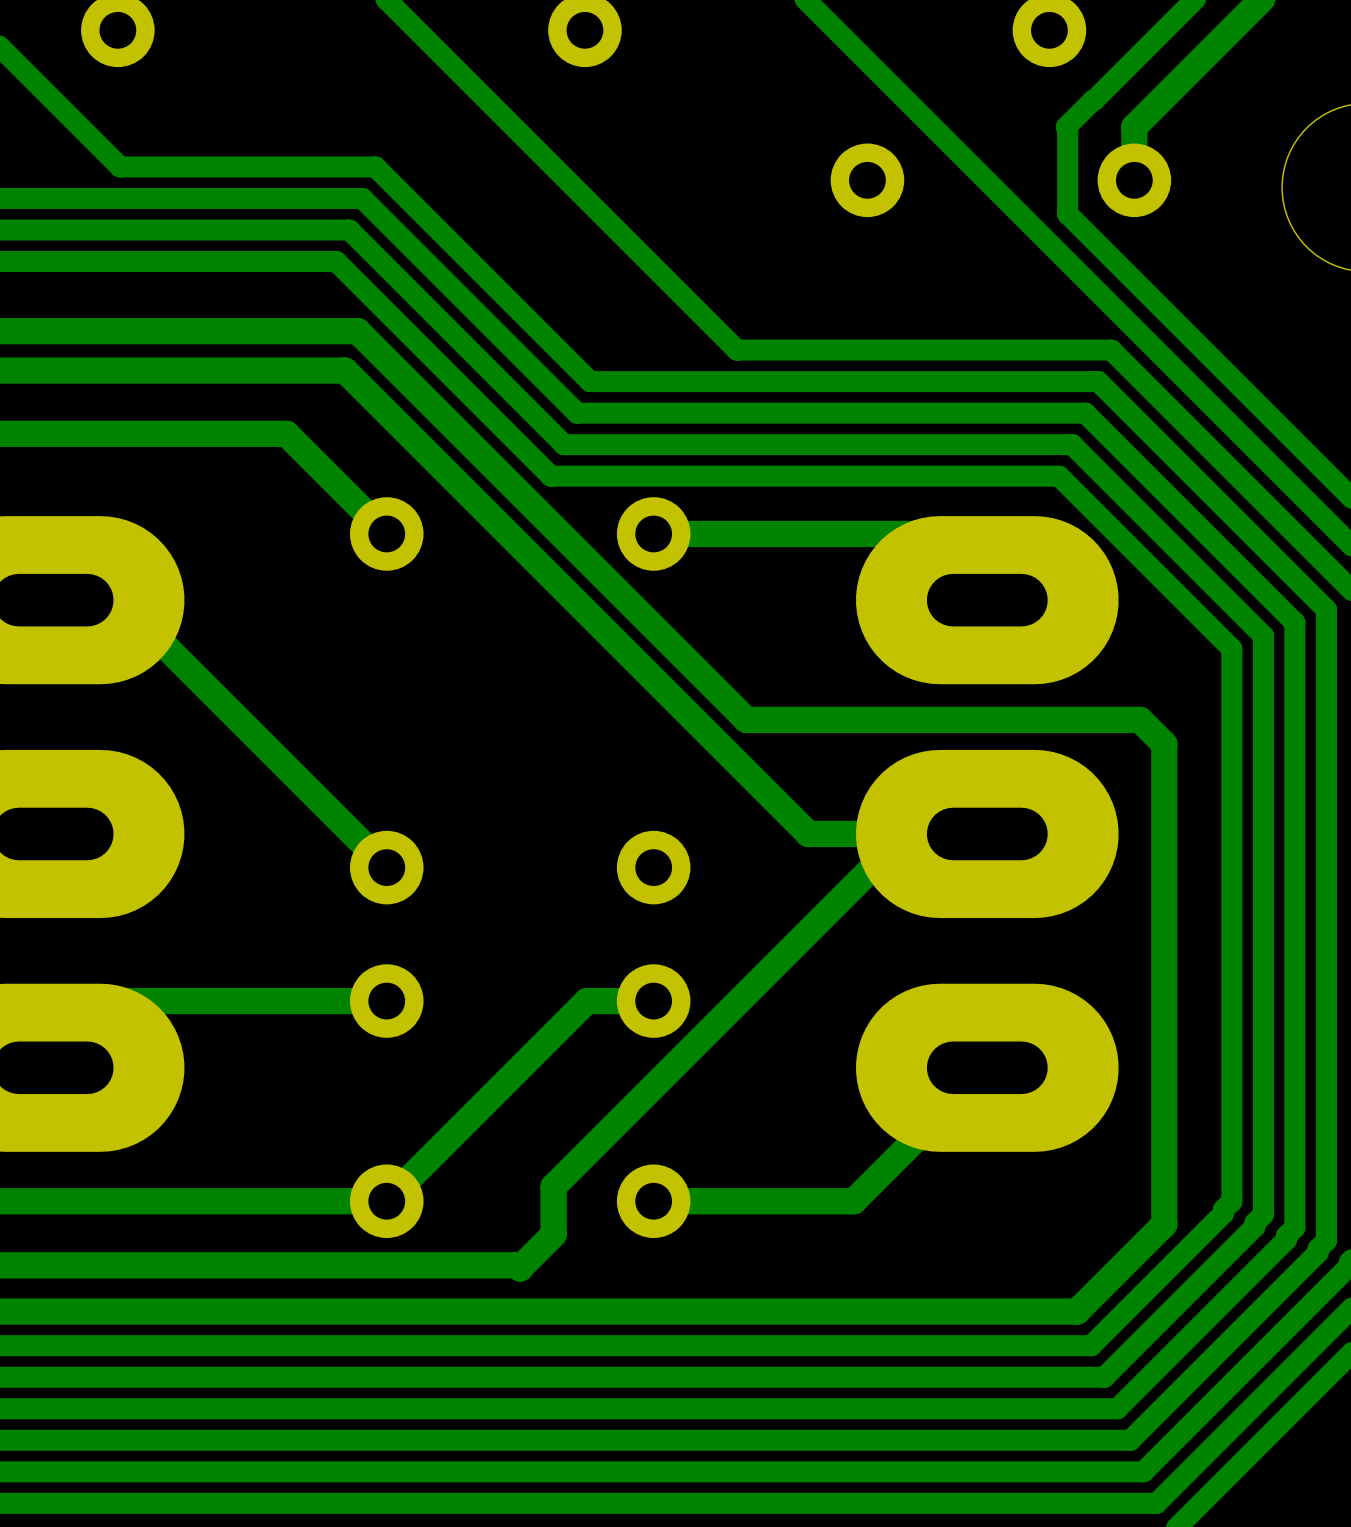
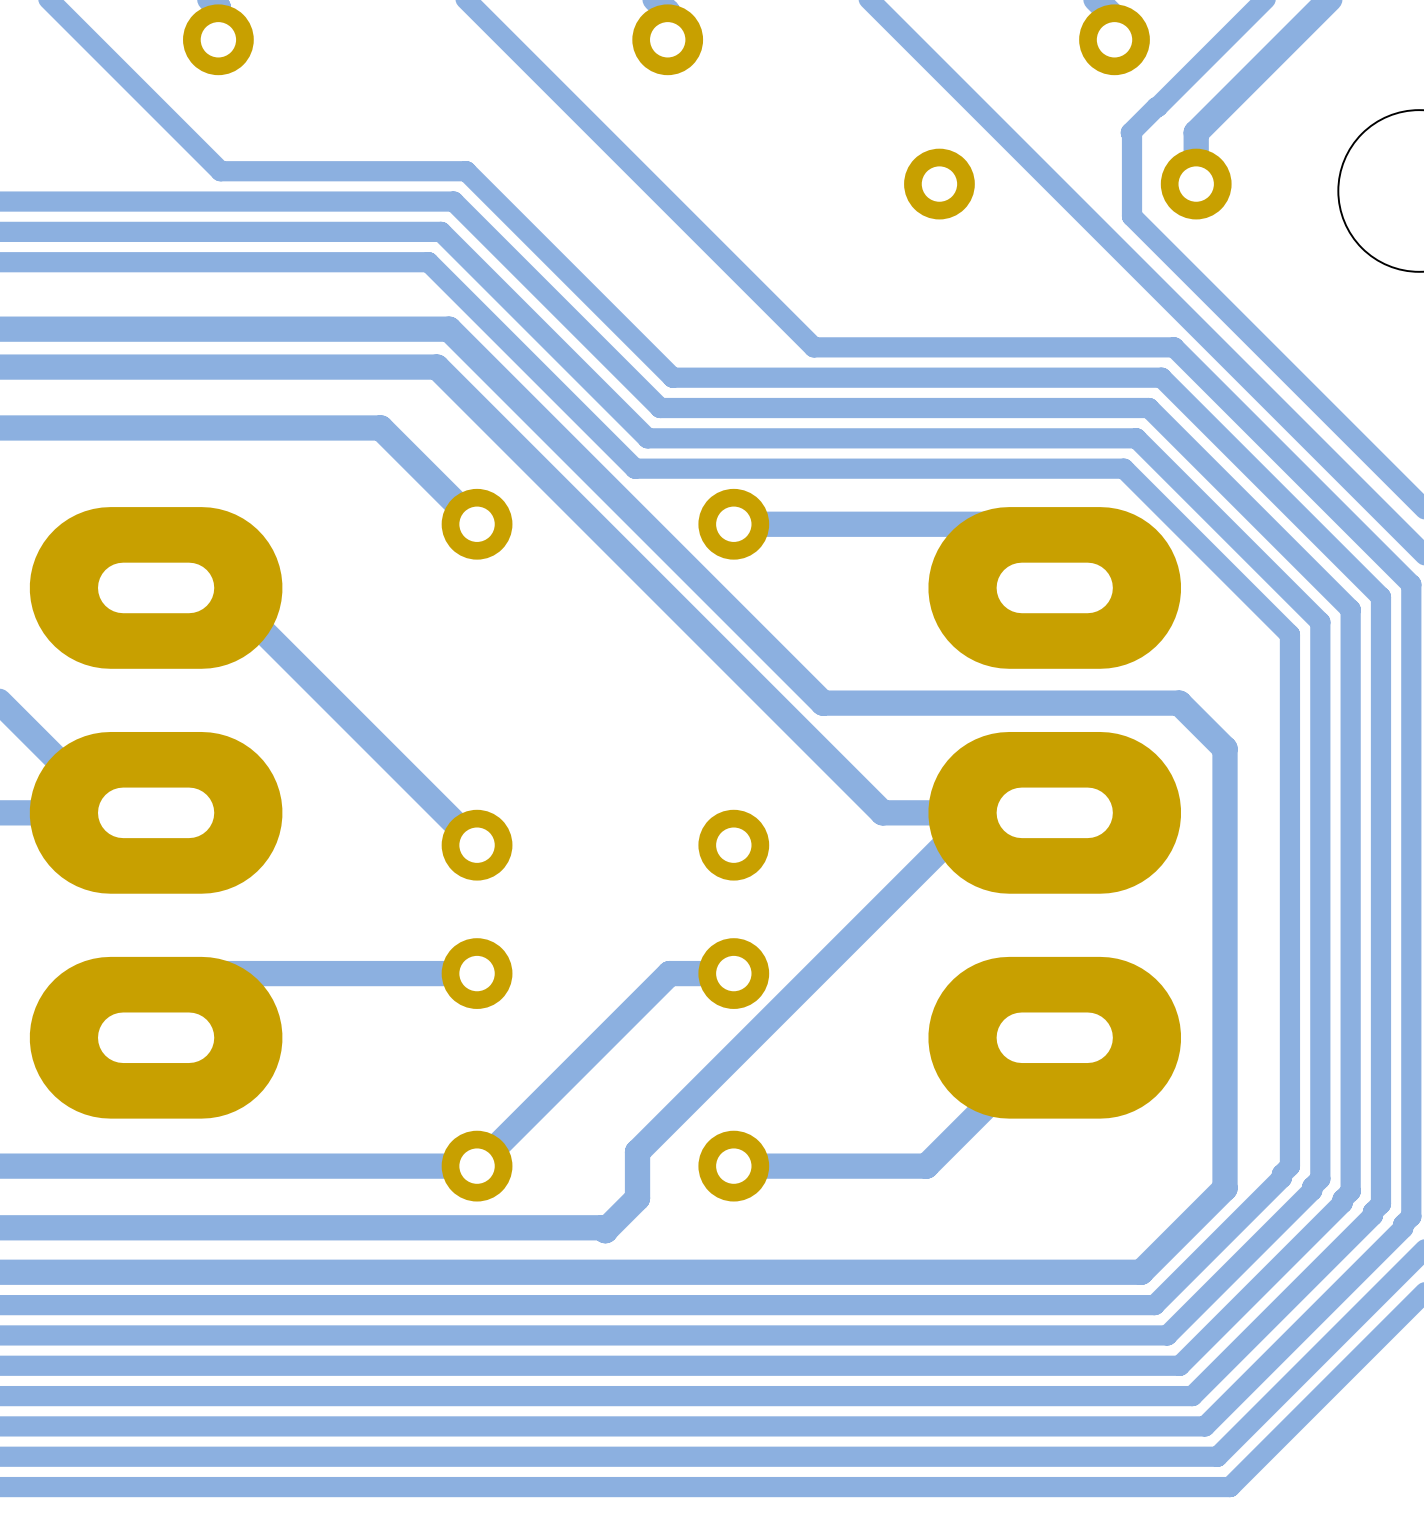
bottom track: (1116, 719) (1140, 719) (1164, 744) (1164, 767) -> (1179, 703) (1225, 748)

